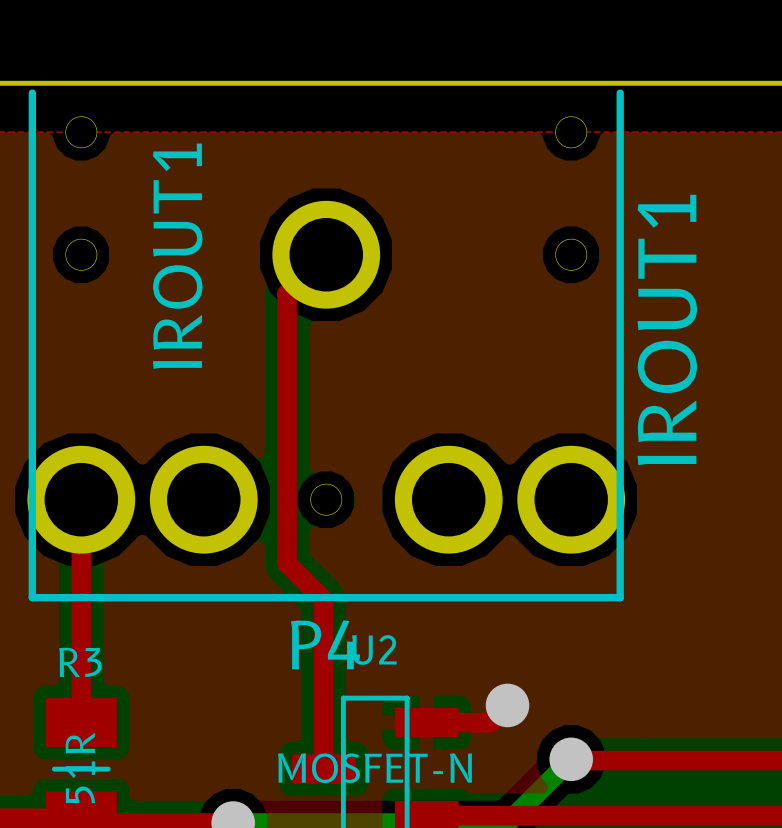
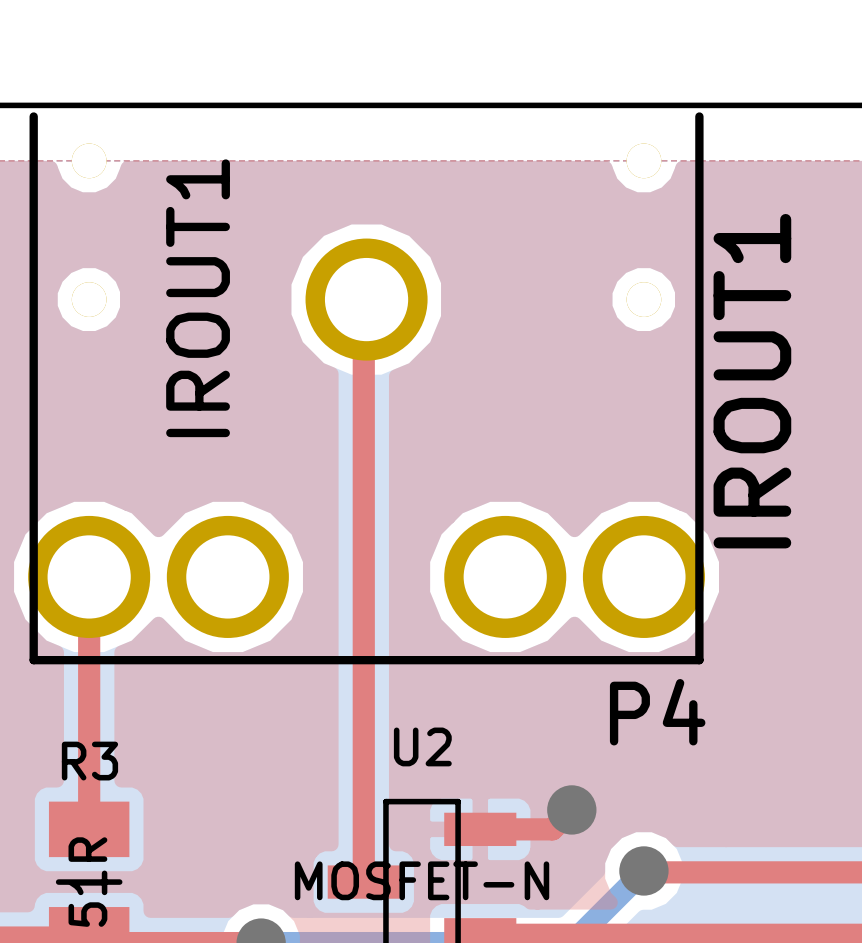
P4 footprint: [27, 89, 626, 602] -> [28, 112, 705, 665]
top track: (323, 257) (287, 293) (287, 563) (323, 600) -> (363, 302) (363, 690)
P4 name position: P4 (325, 644) -> P4 (657, 712)

